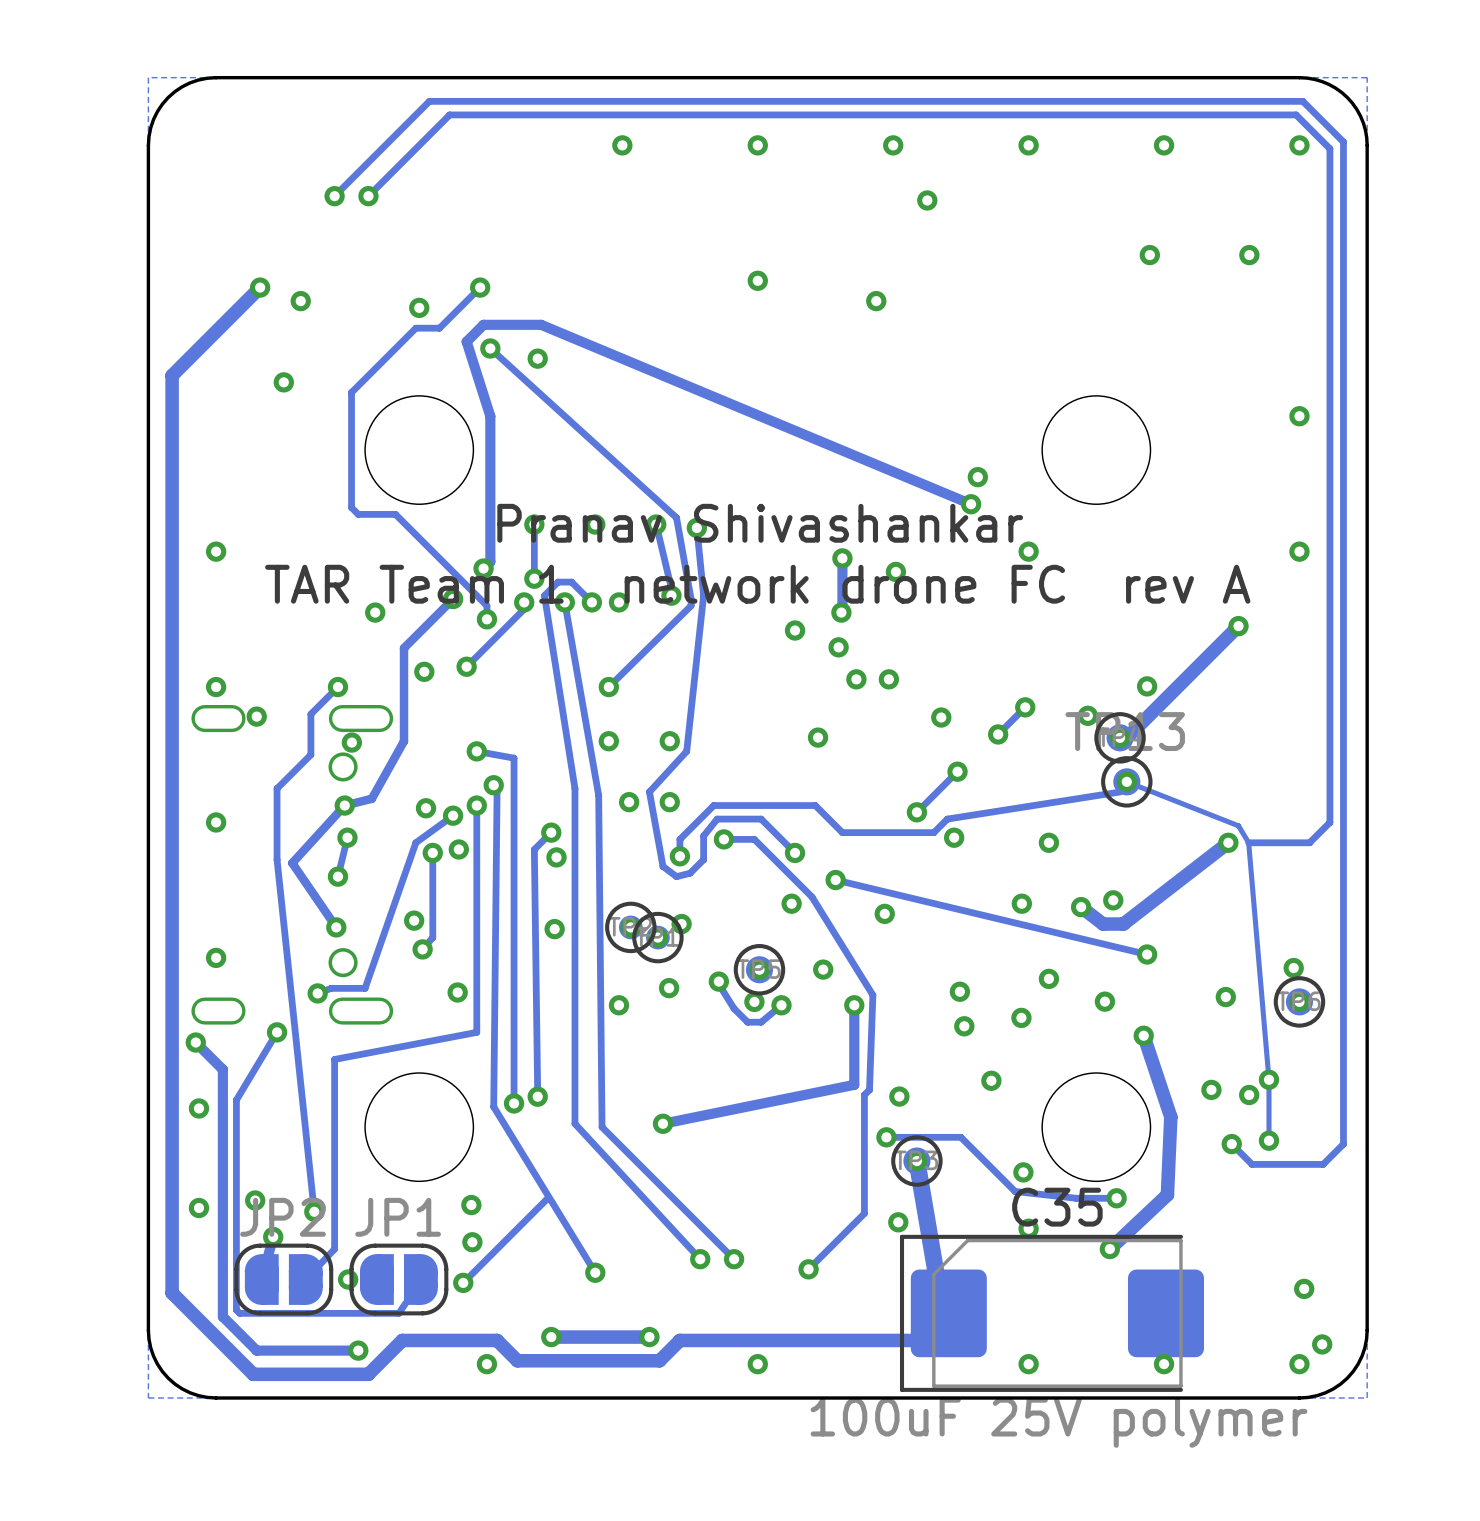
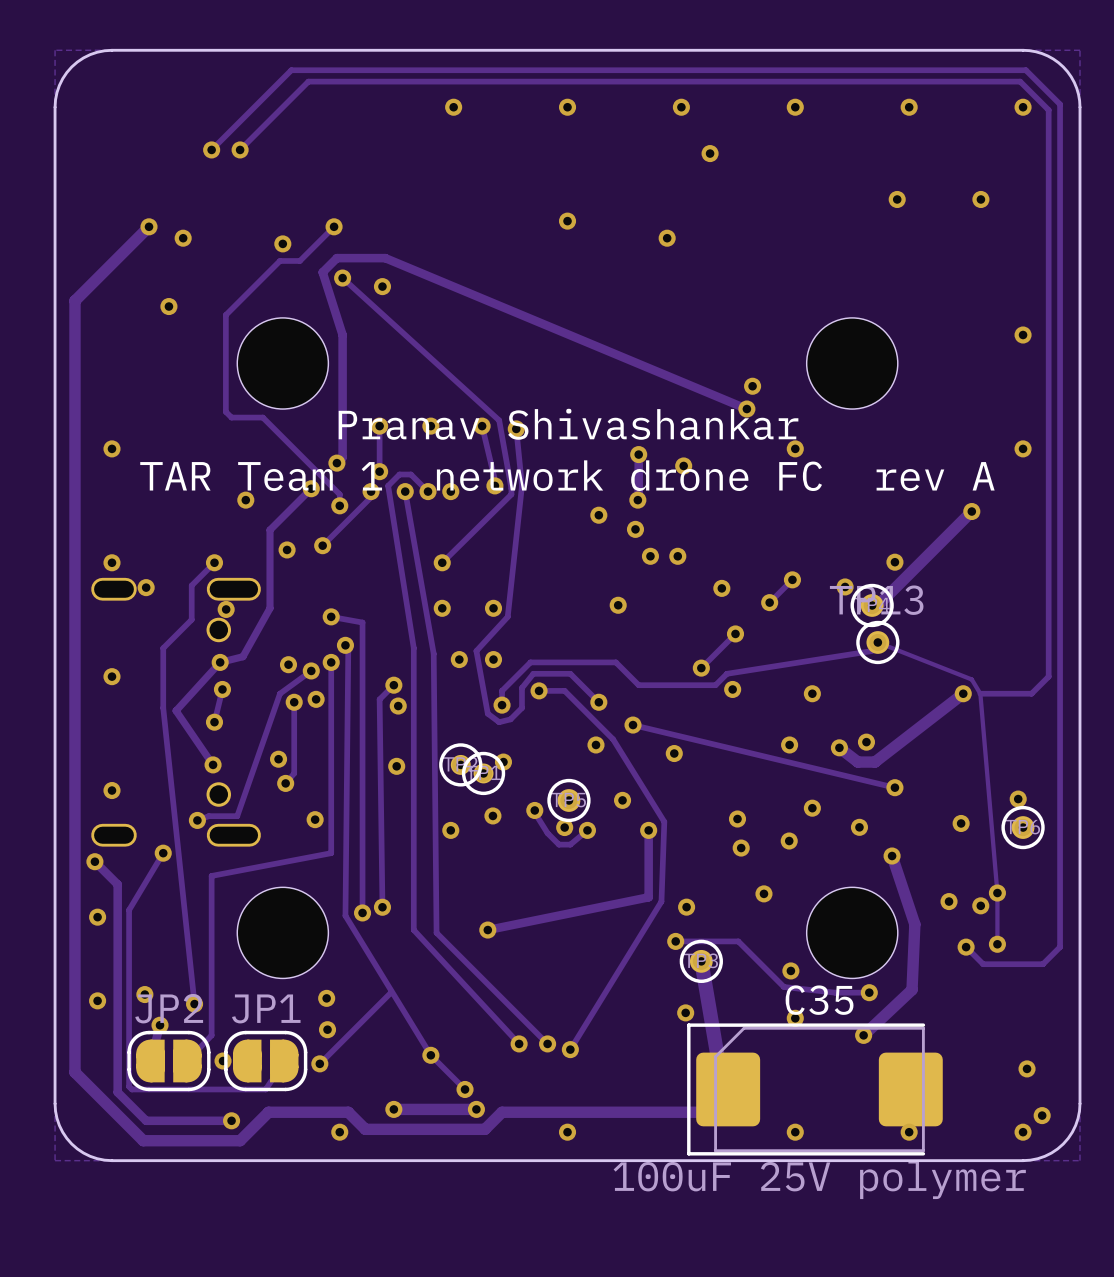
track: (869, 1089) (864, 1095) (864, 1213) (808, 1269) -> (661, 901) (570, 1049)
via position: (808, 1269) -> (570, 1049)
track: none -> (430, 1055) (465, 1089)
via: none -> (465, 1089)

